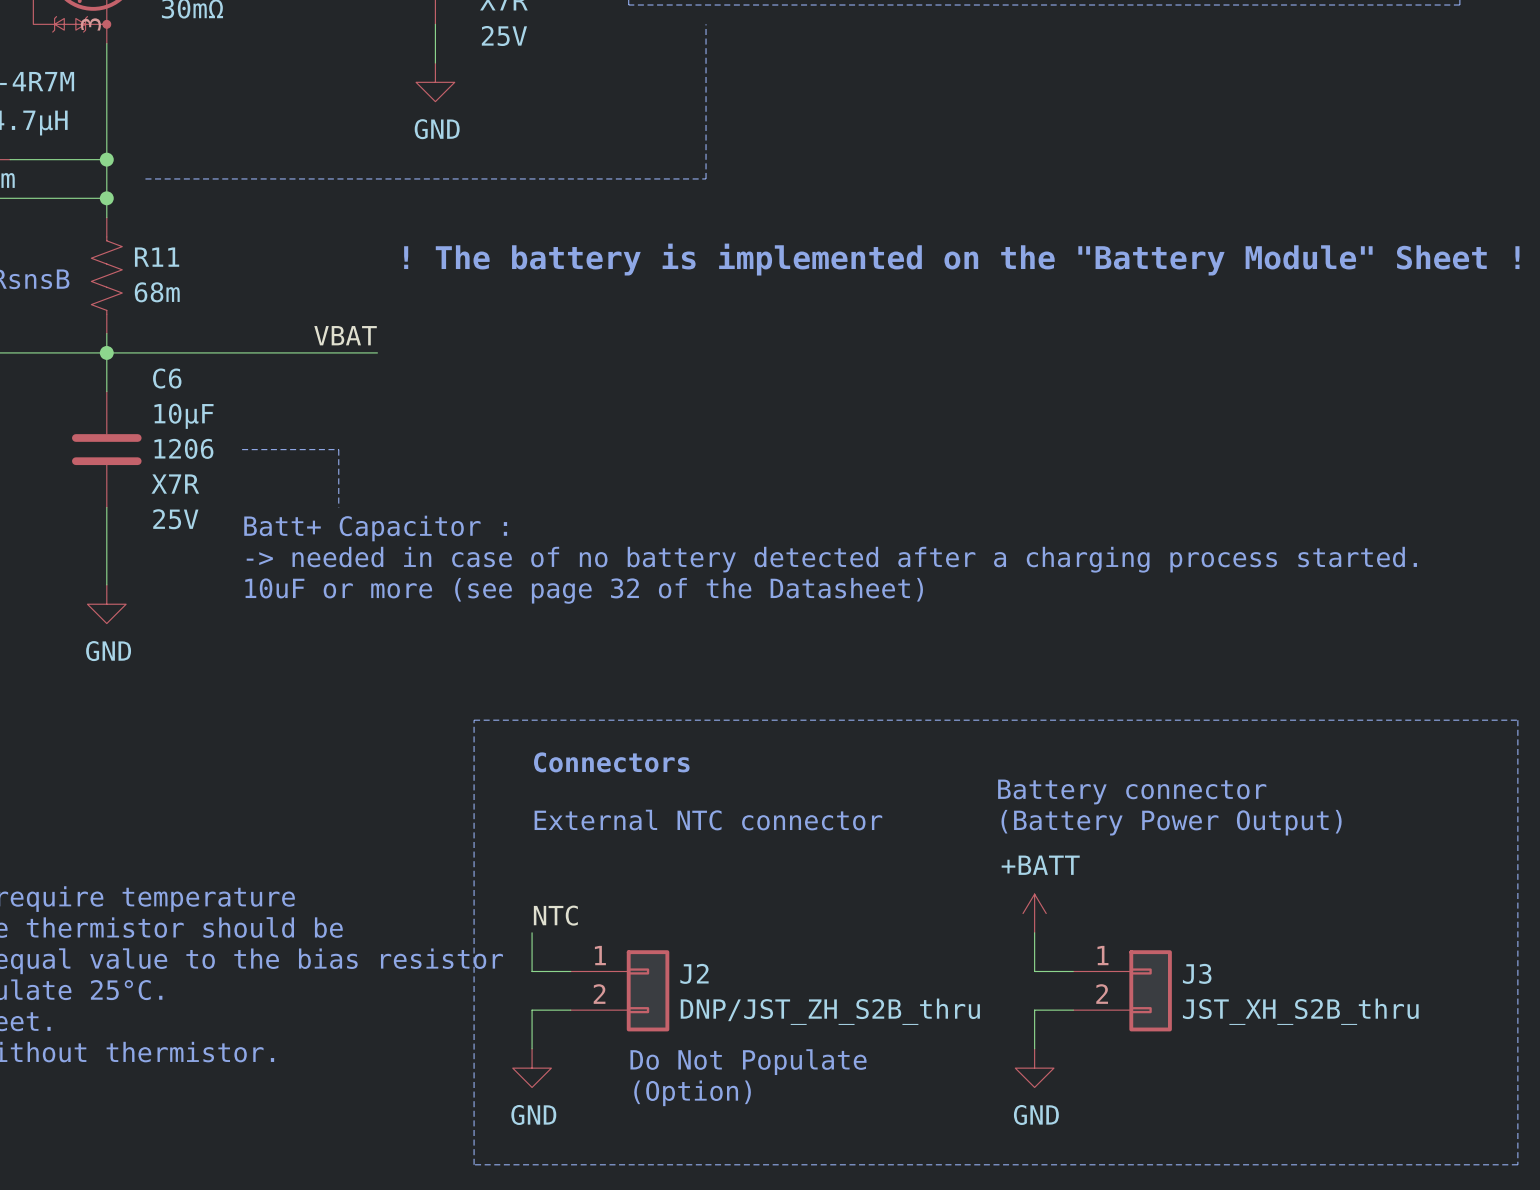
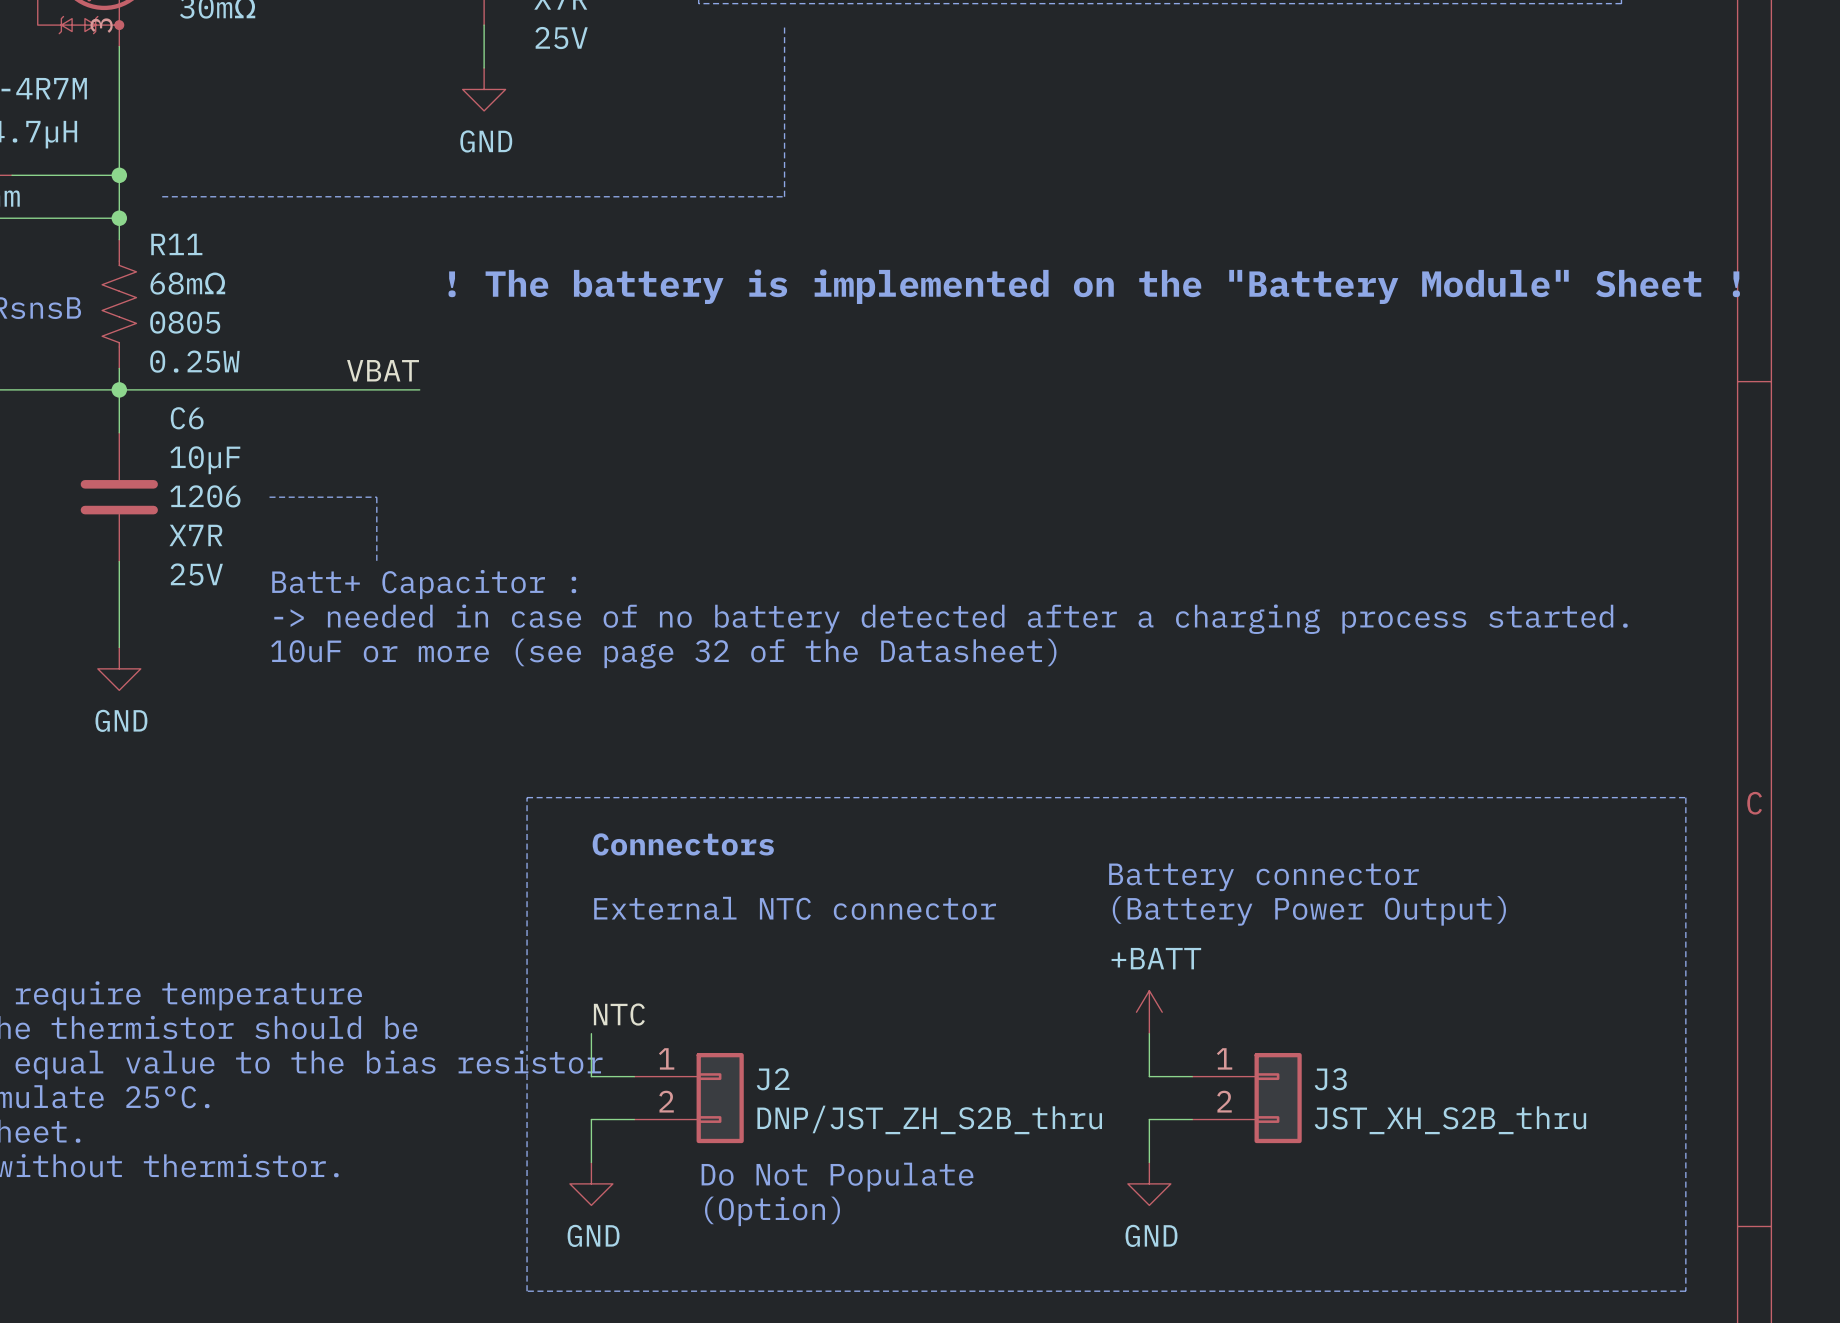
R11 name position: R11 (157, 257) -> R11 (176, 244)
R11 text: none -> 68mΩ (187, 283)
R11 value: 68m (157, 292) -> none
R11 text: none -> 0805 (185, 322)
R11 text: none -> 0.25W (194, 361)

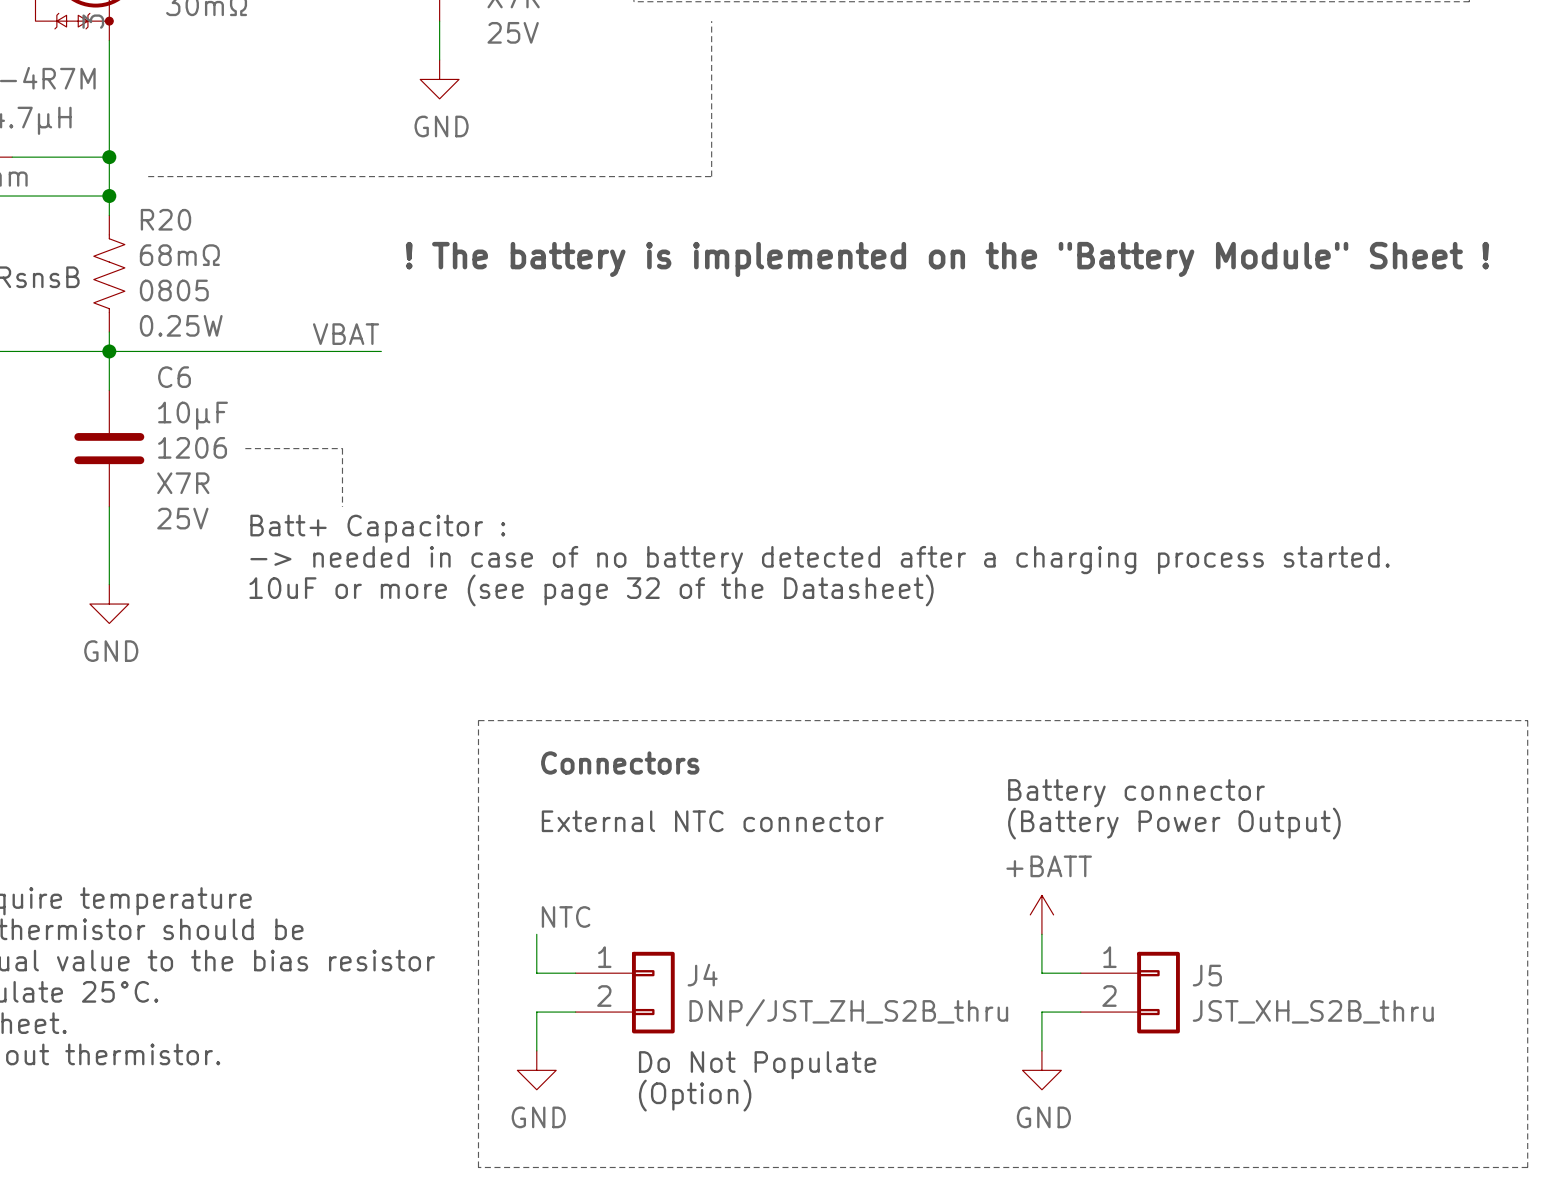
R11 name: R11 (176, 244) -> R20 (165, 219)
J2 name: J2 (773, 1079) -> J4 (702, 975)
J3 name: J3 (1330, 1079) -> J5 (1207, 975)

